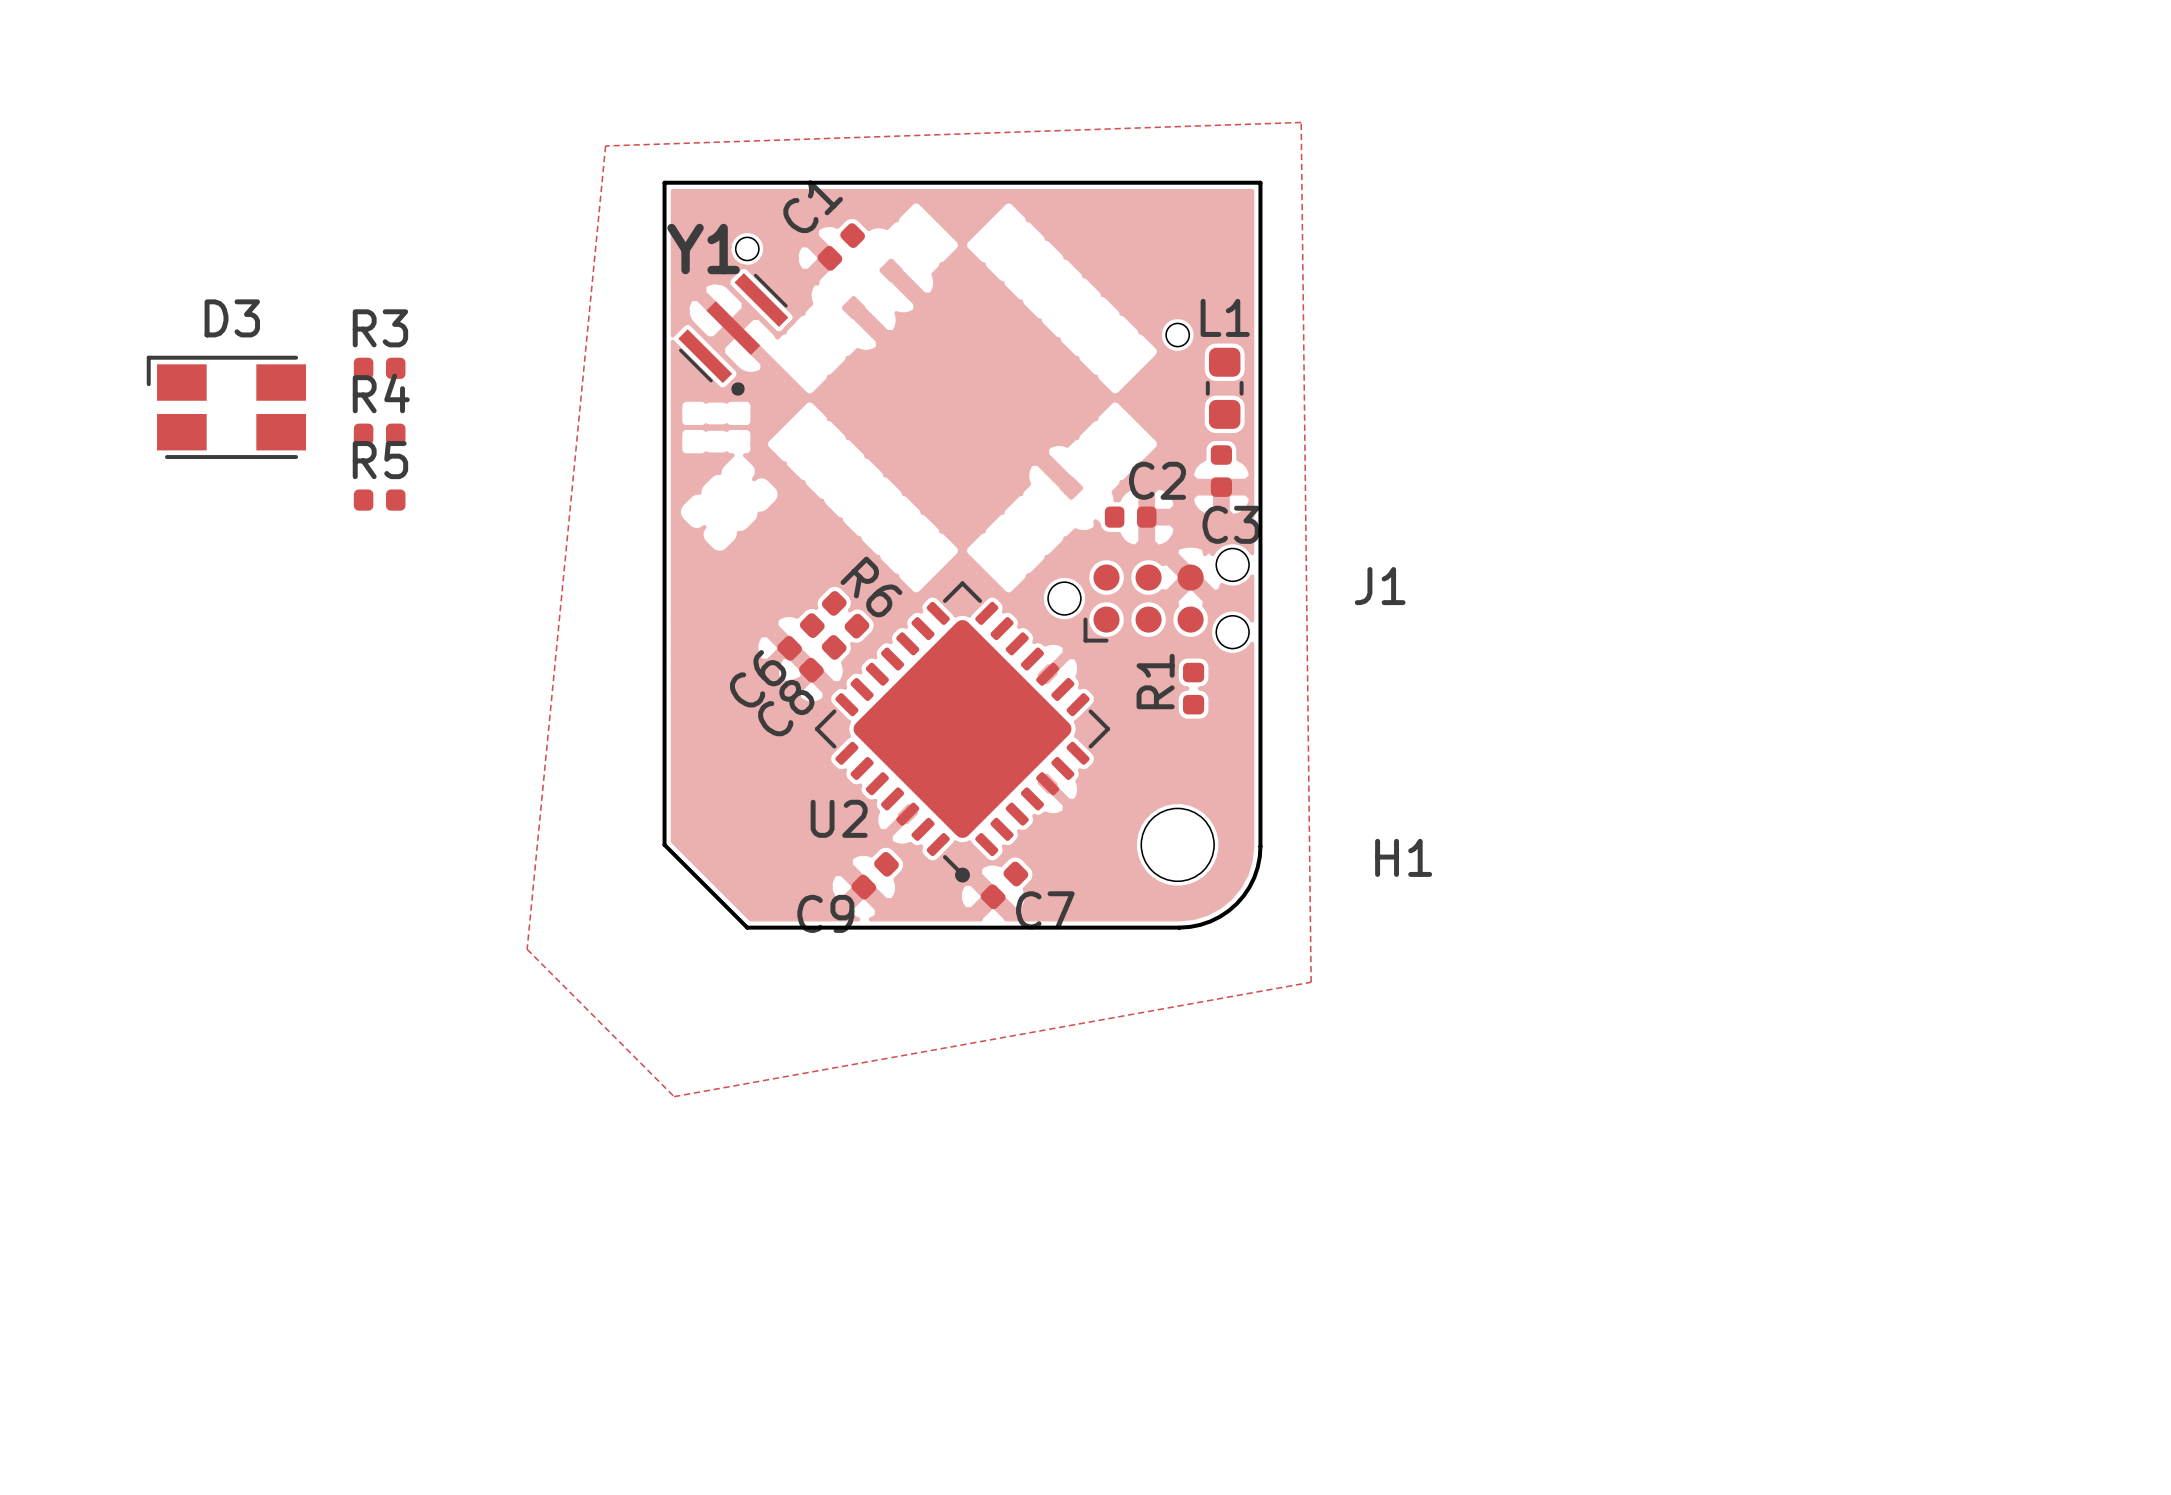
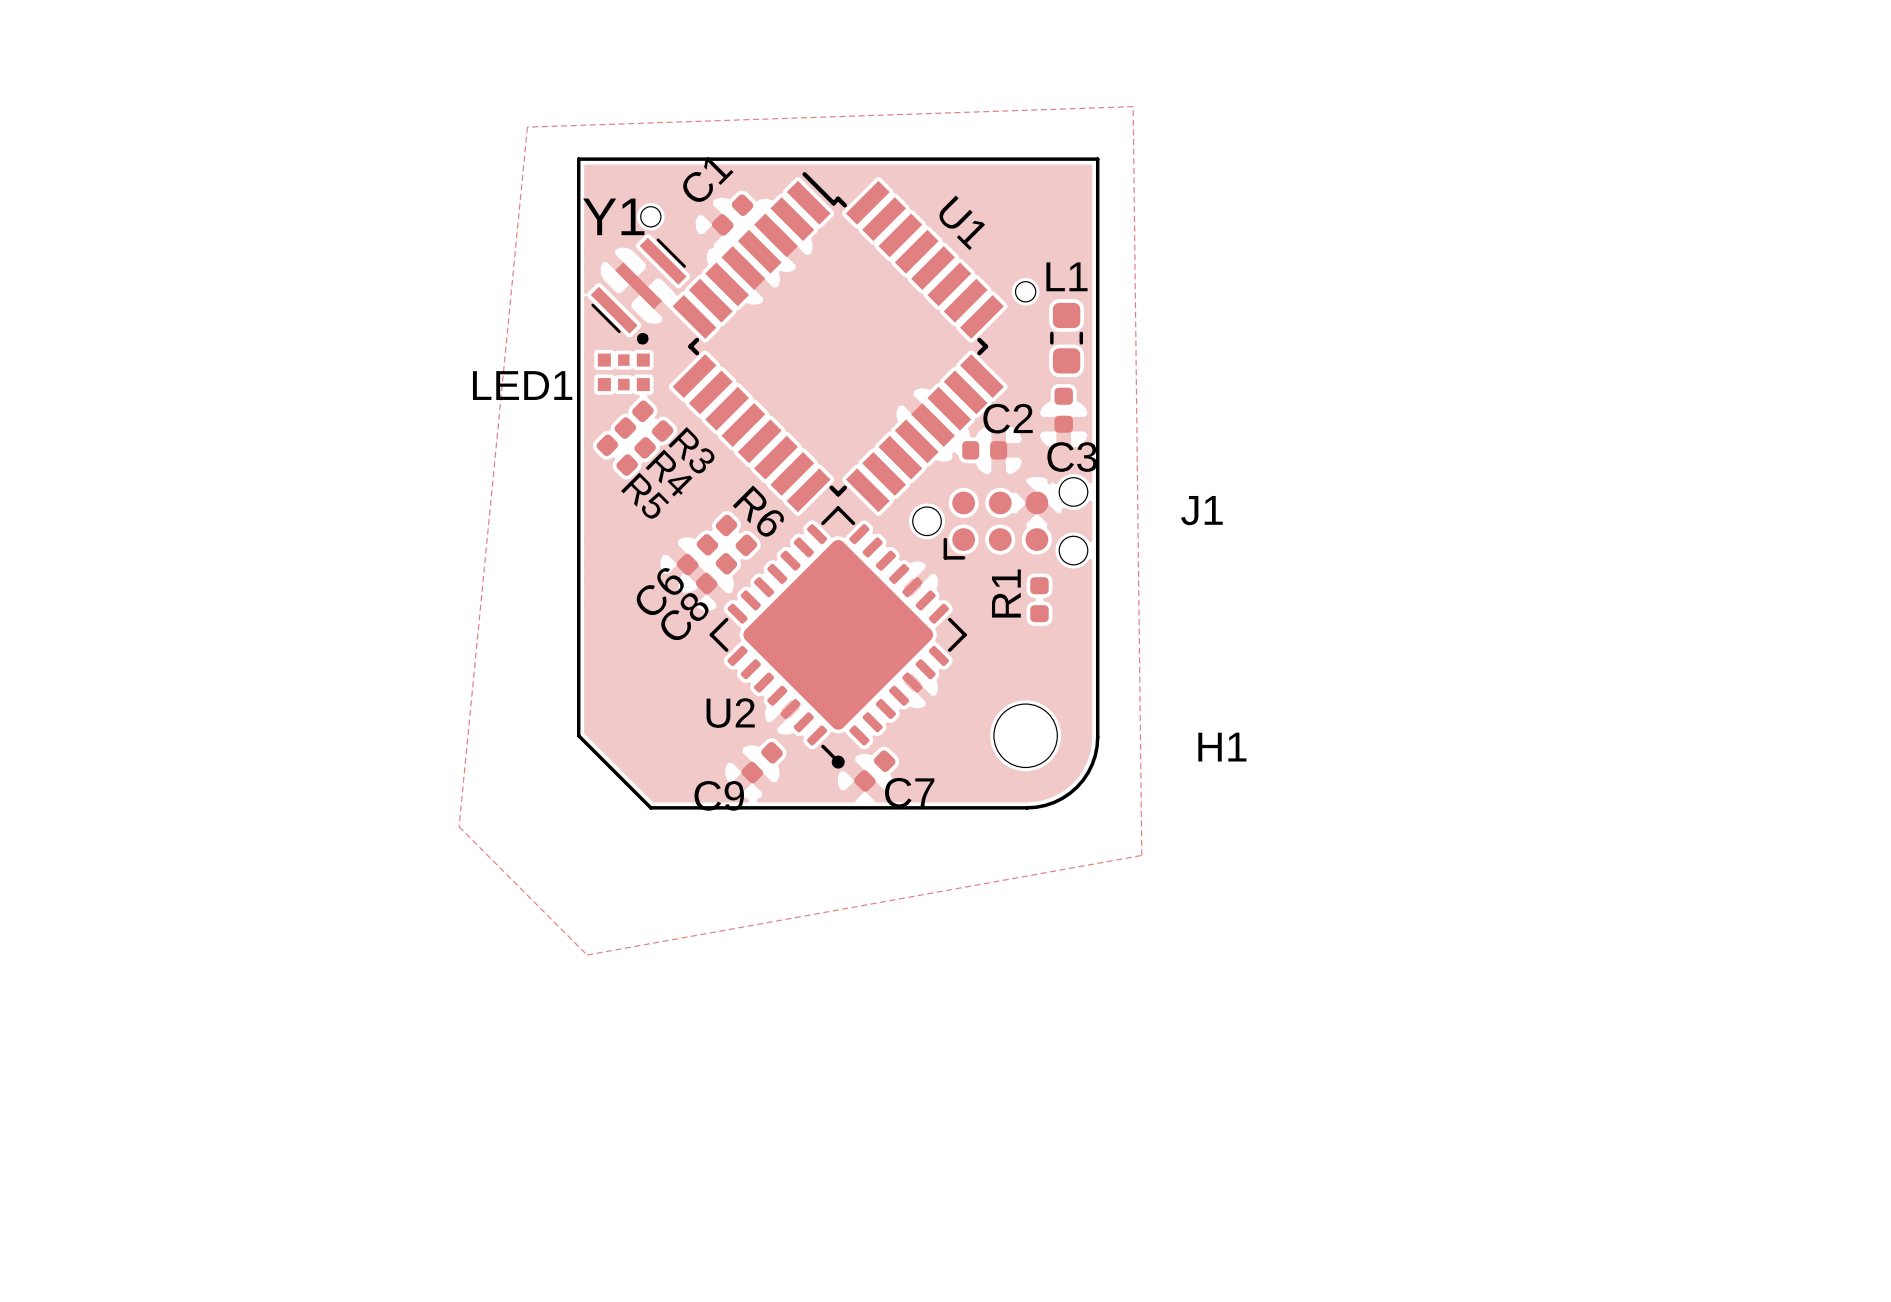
R3 rotation: 0° (379, 368) -> 45° clockwise (652, 421)
R3 position: (379, 368) -> (652, 421)
U1: none -> (838, 342)
R4 name position: R4 (381, 393) -> R4 (669, 472)
D3: (226, 407) -> none
LED1: none -> (623, 372)
R4 rotation: 0° (379, 434) -> 45° clockwise (635, 438)
R4 position: (379, 434) -> (635, 438)
R5 name position: R5 (380, 460) -> R5 (645, 495)
R5 rotation: 0° (379, 500) -> 45° clockwise (617, 455)
R5 position: (379, 500) -> (617, 455)

